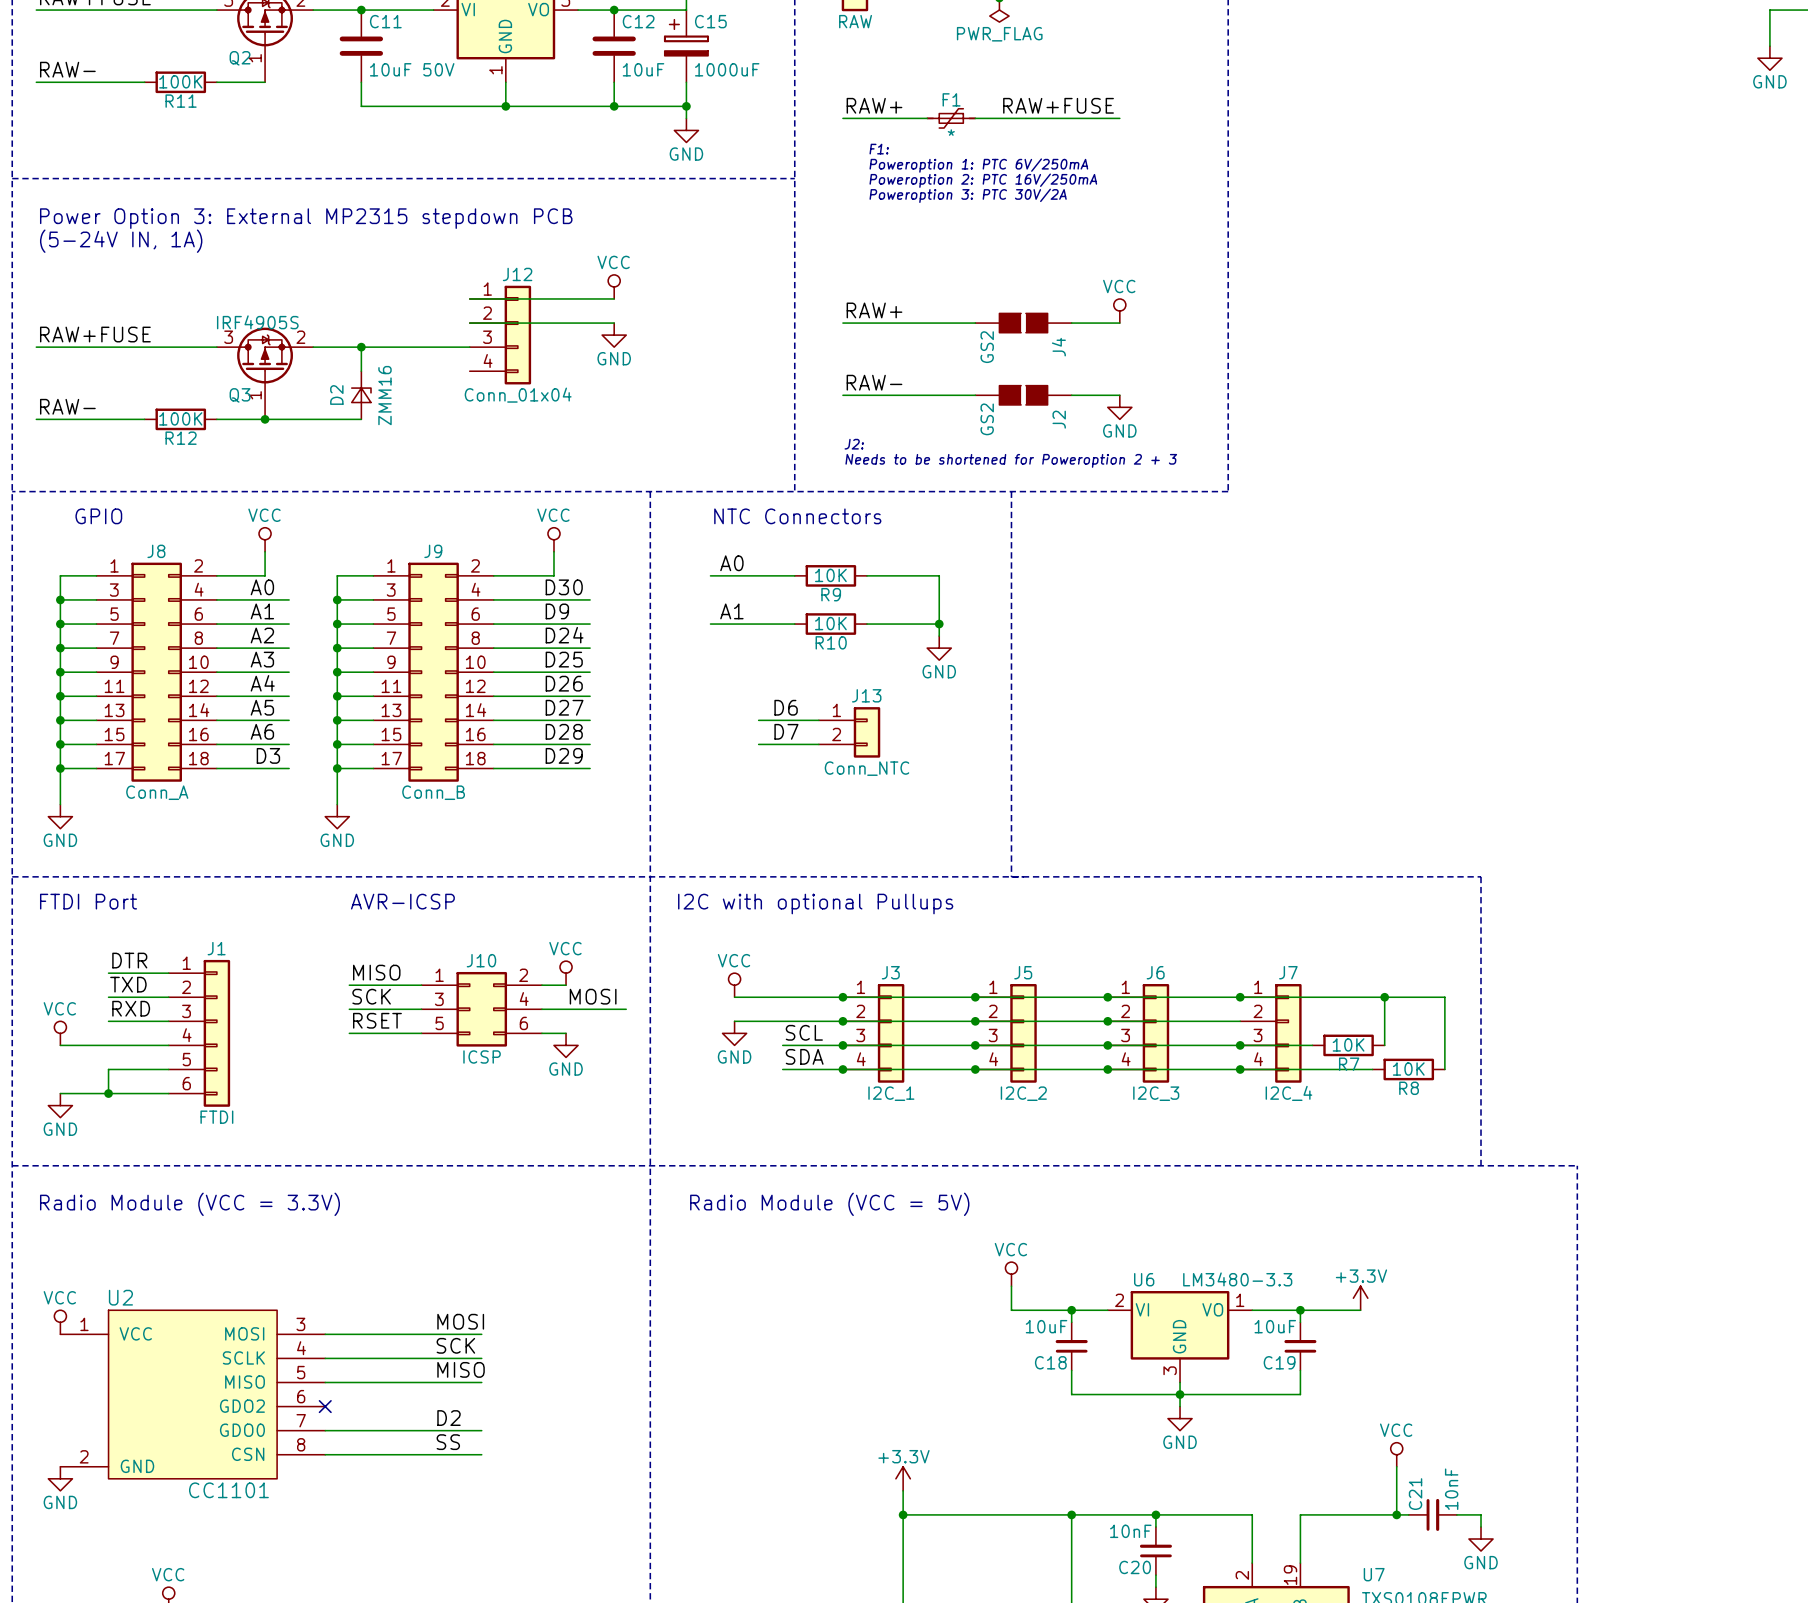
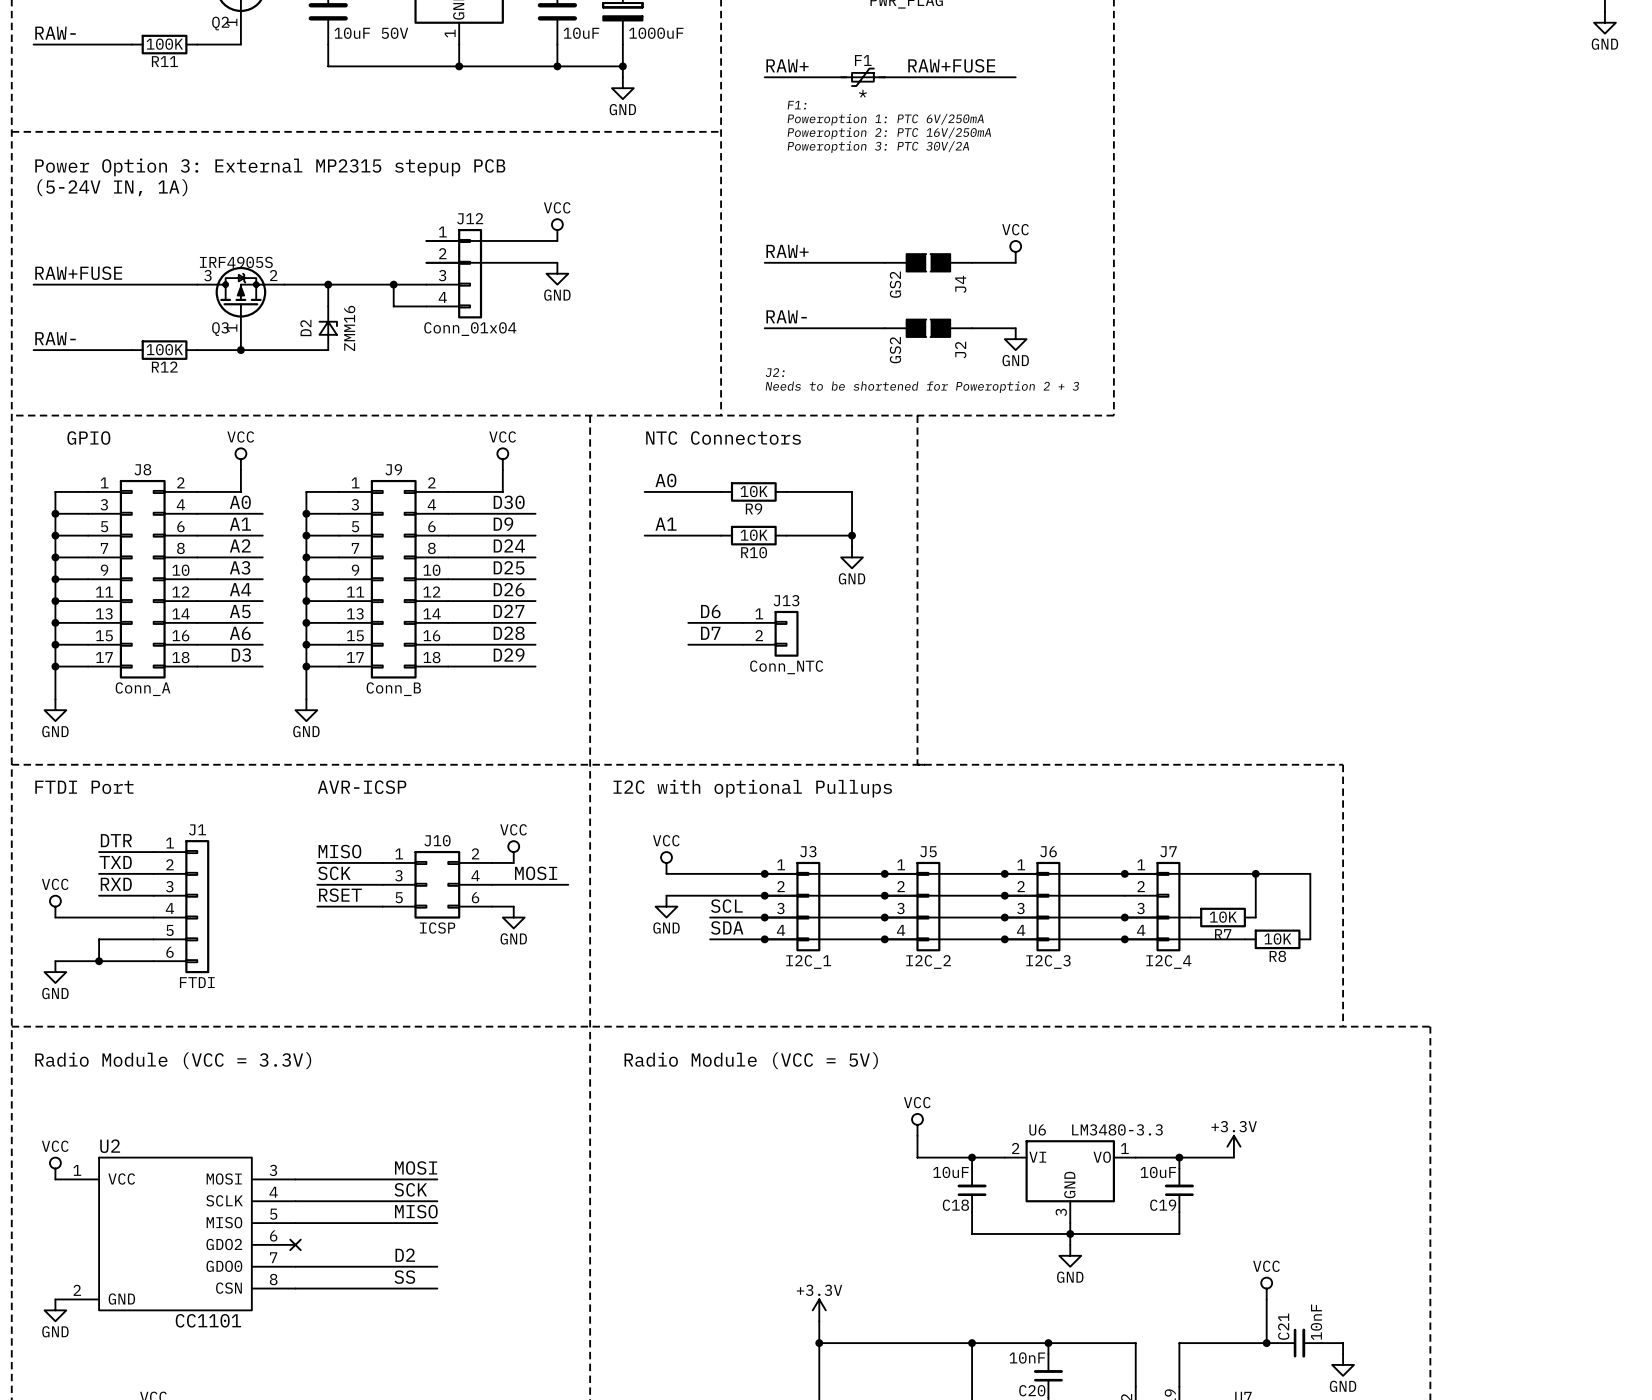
text: Power Option 3: External MP2315 stepdown PCB (306, 218) -> Power Option 3: External MP2315 stepup PCB (270, 167)
wire: none -> (393, 284) (393, 306) (426, 306)
junction: none -> (393, 284)

